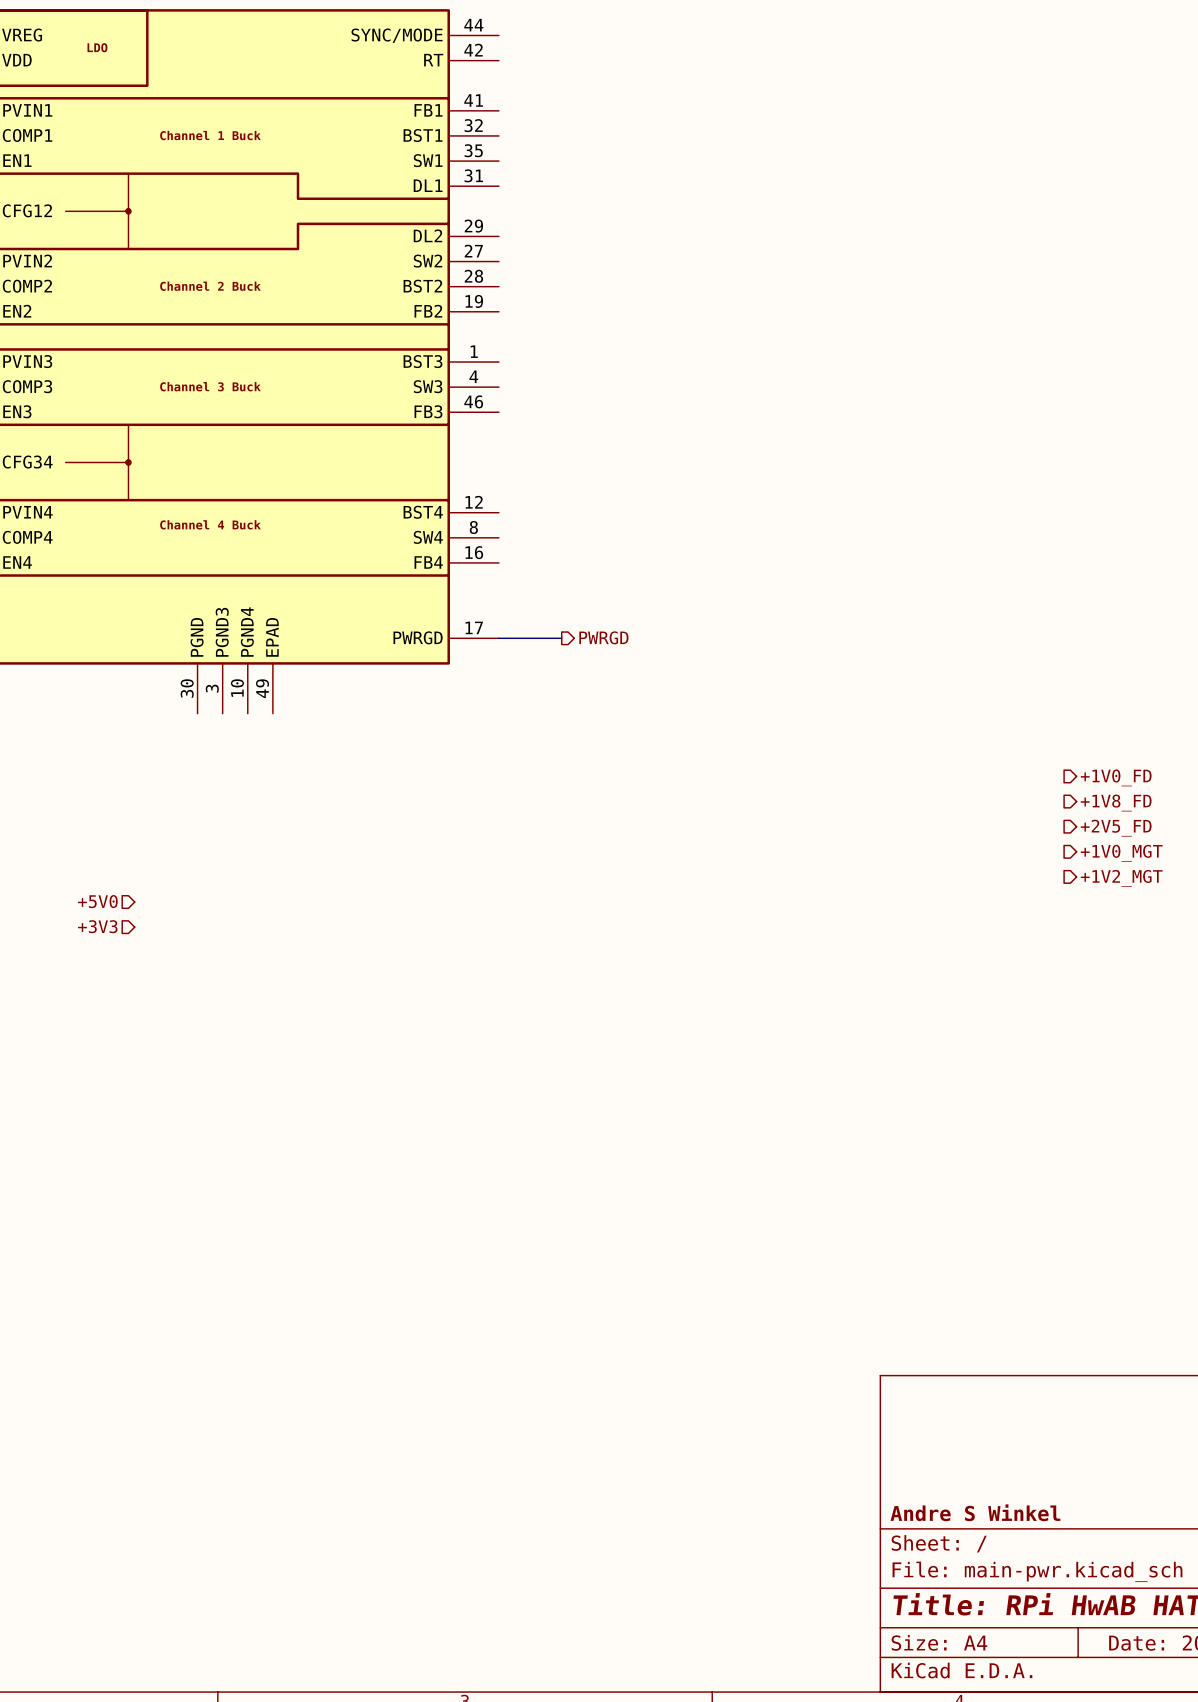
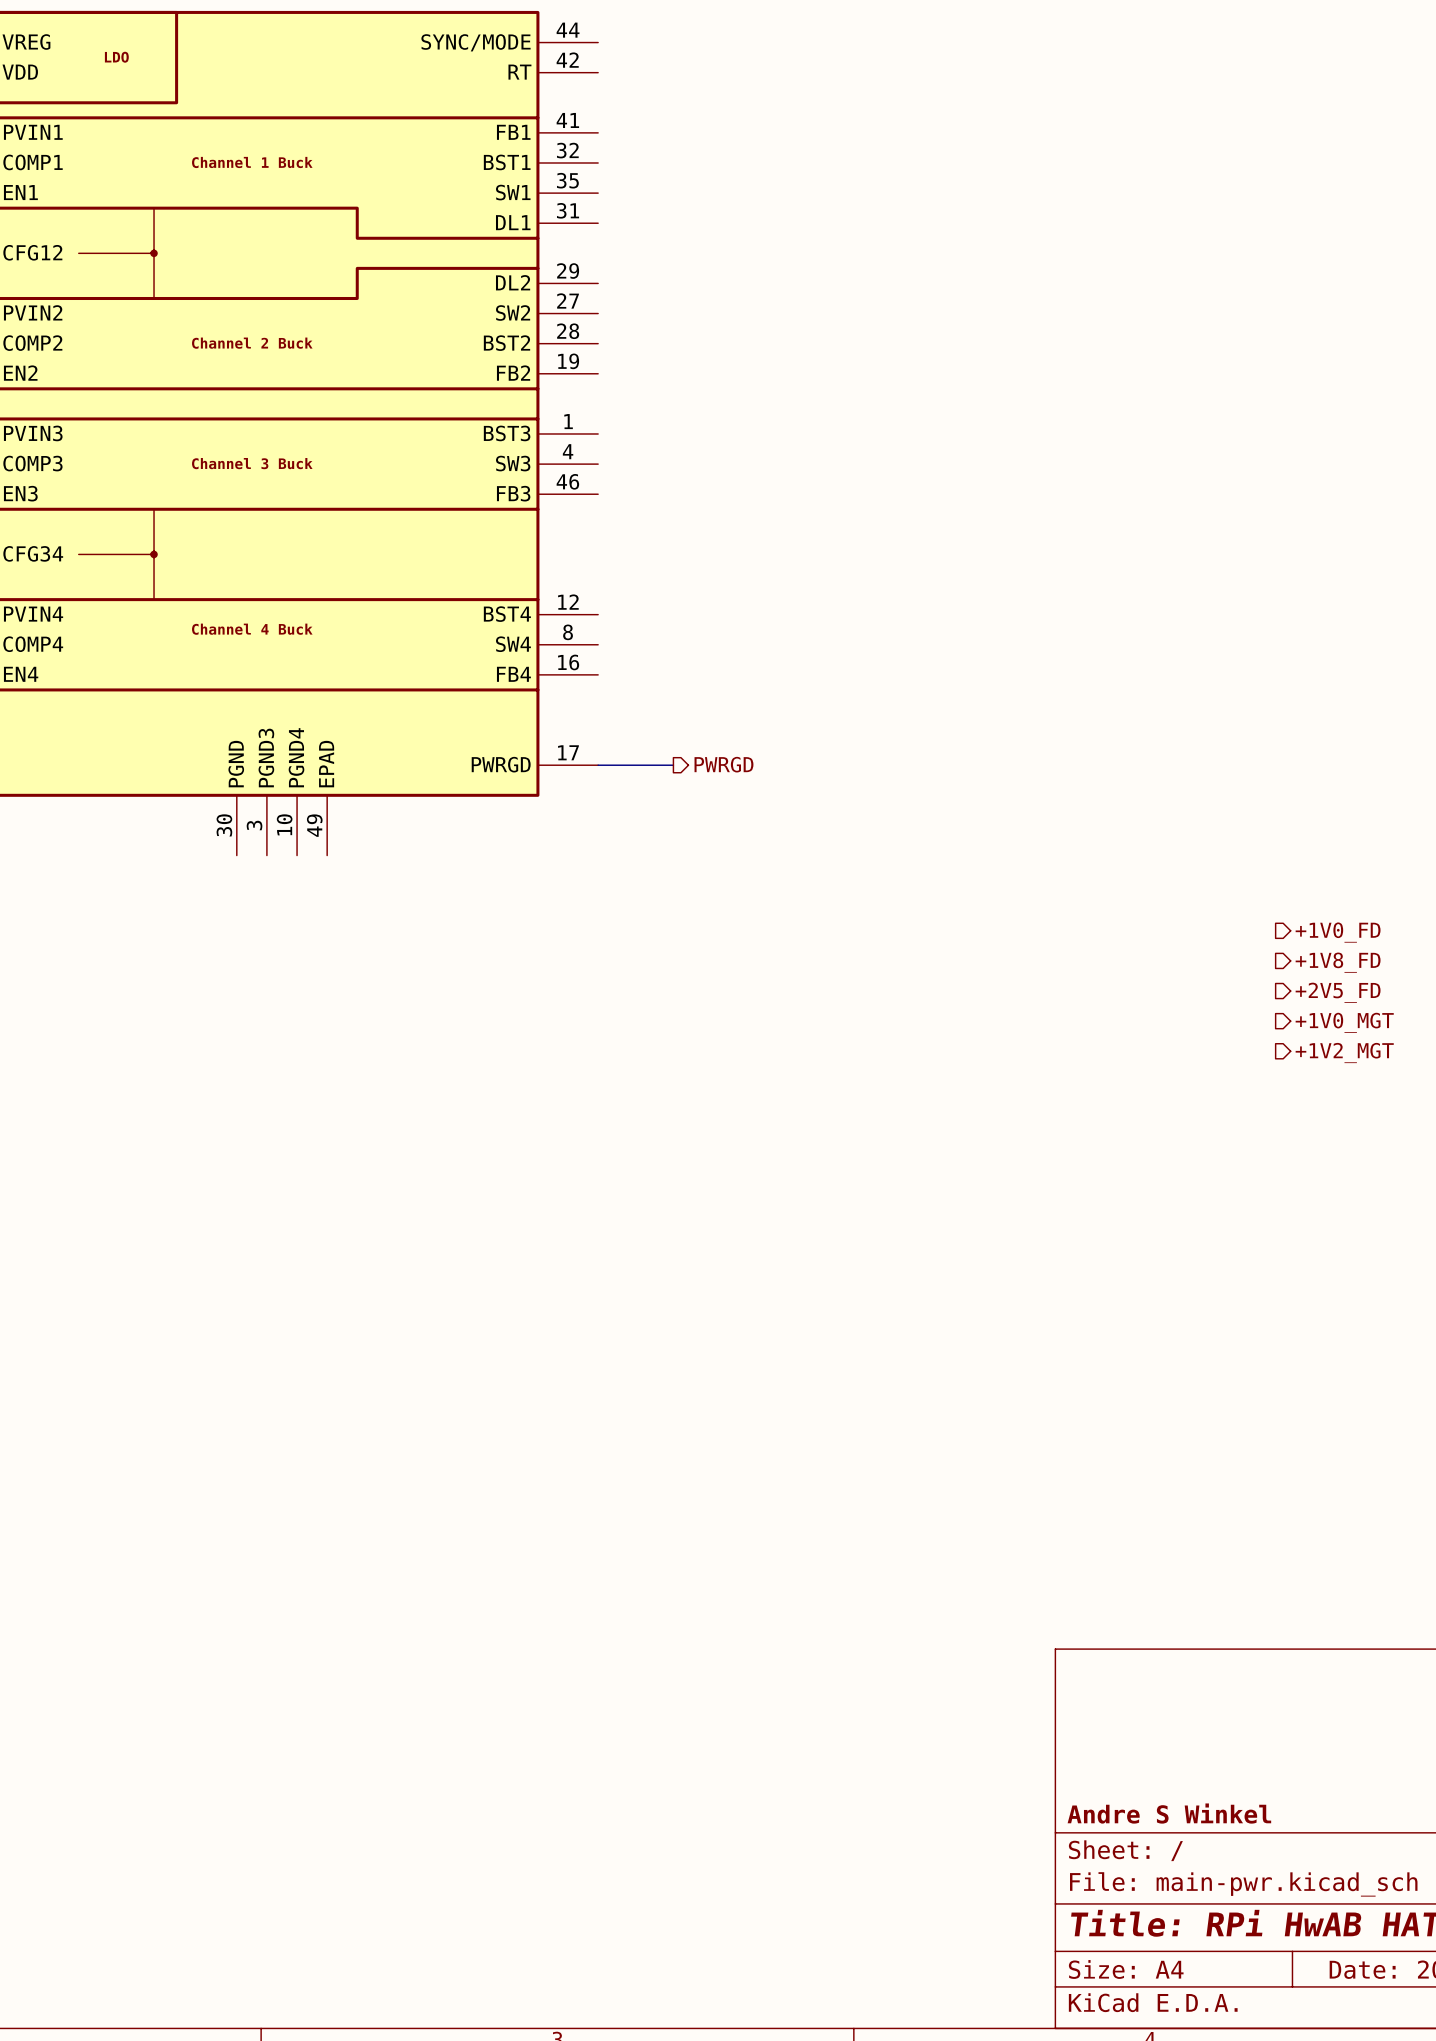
hierarchical label: +5V0 (97, 901) -> none
hierarchical label: +3V3 (97, 926) -> none

